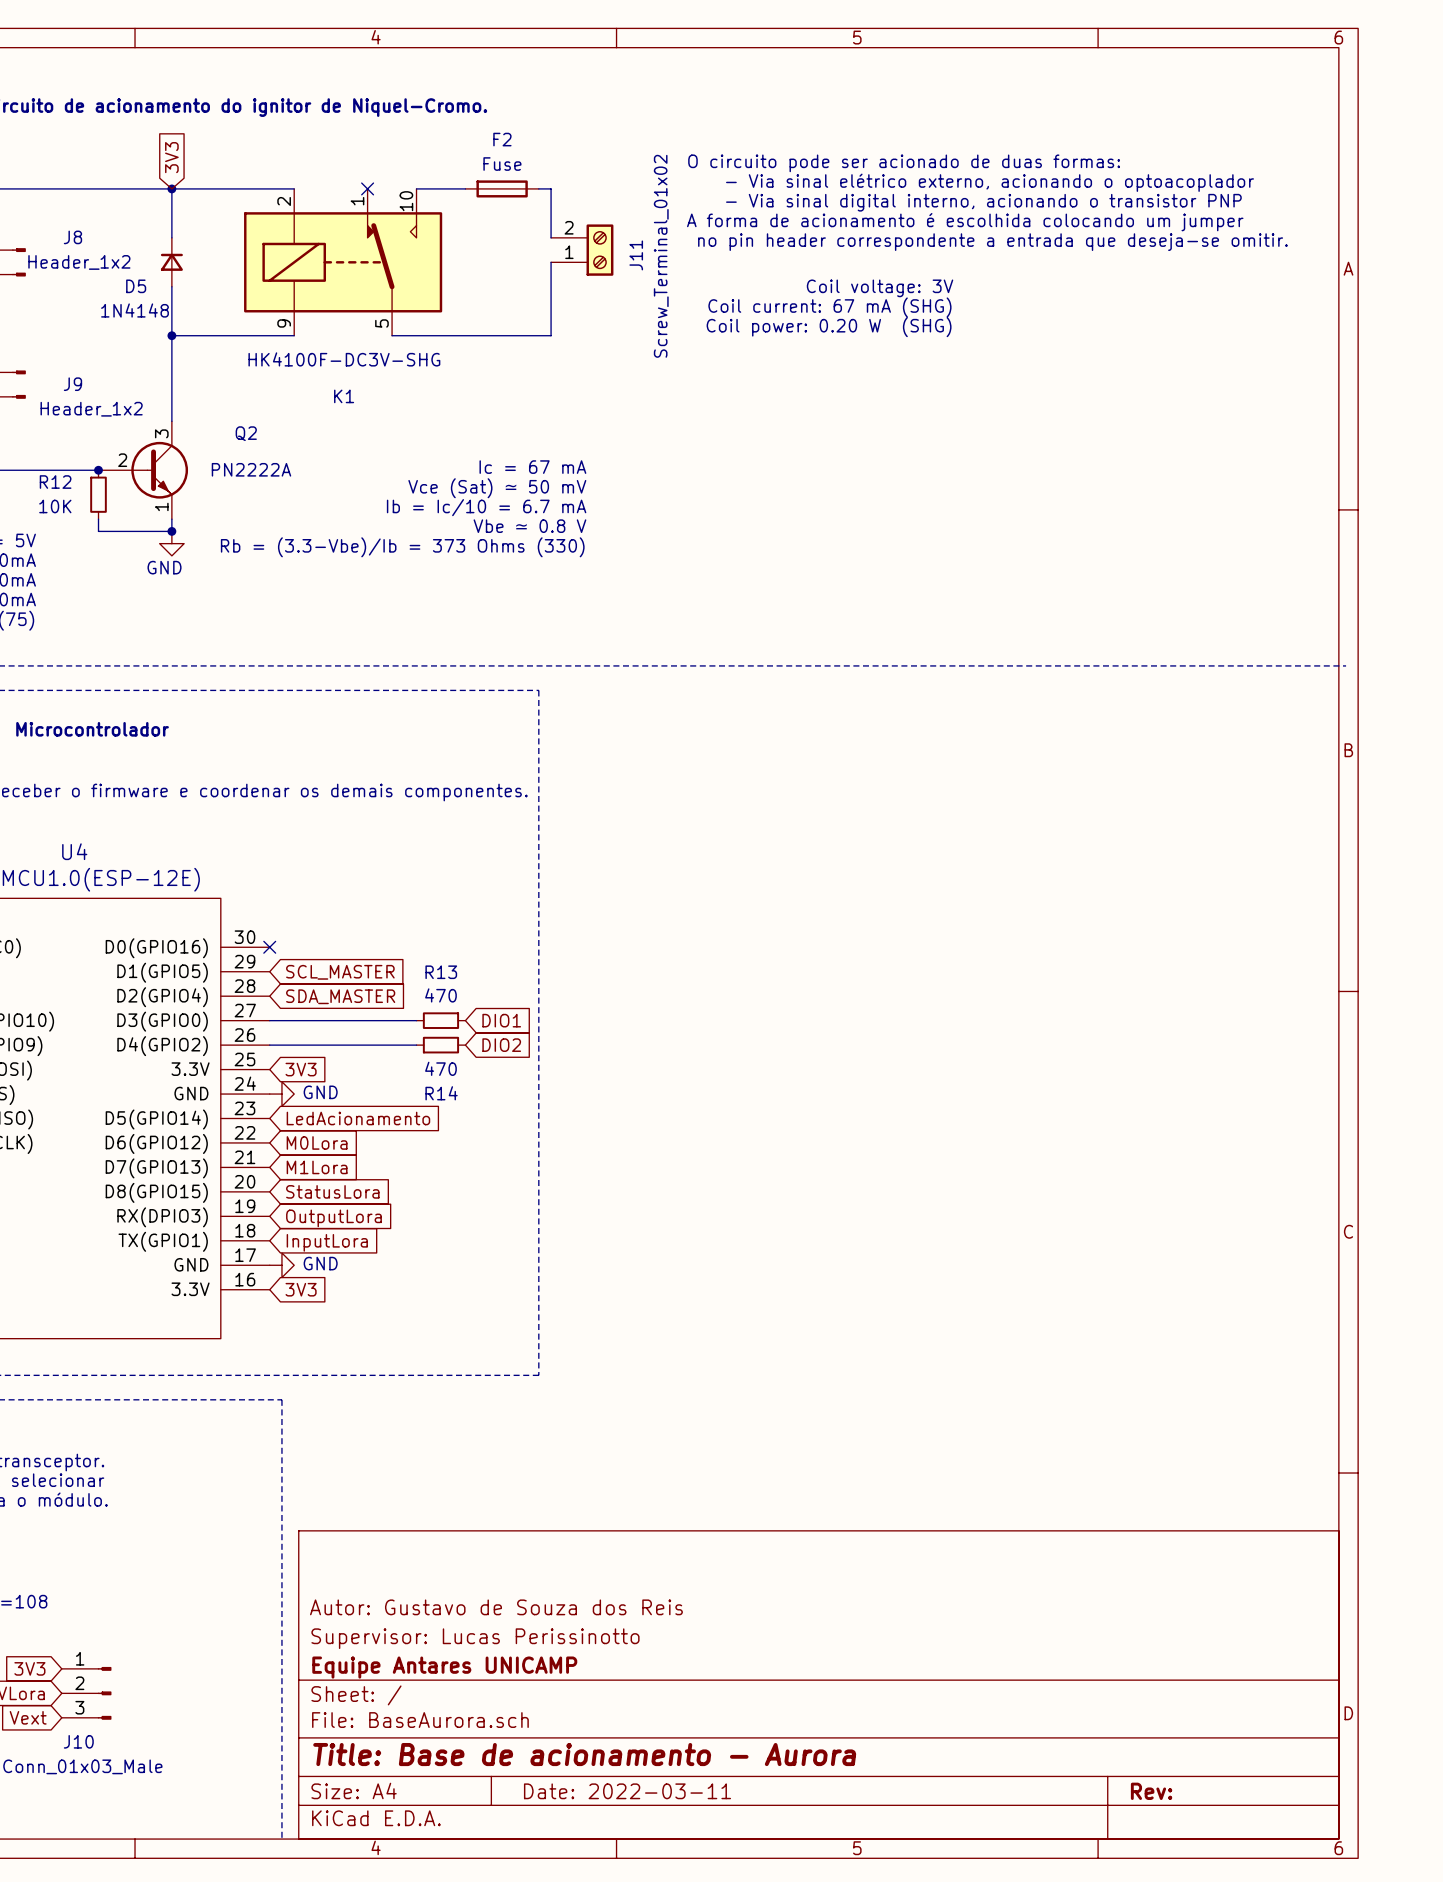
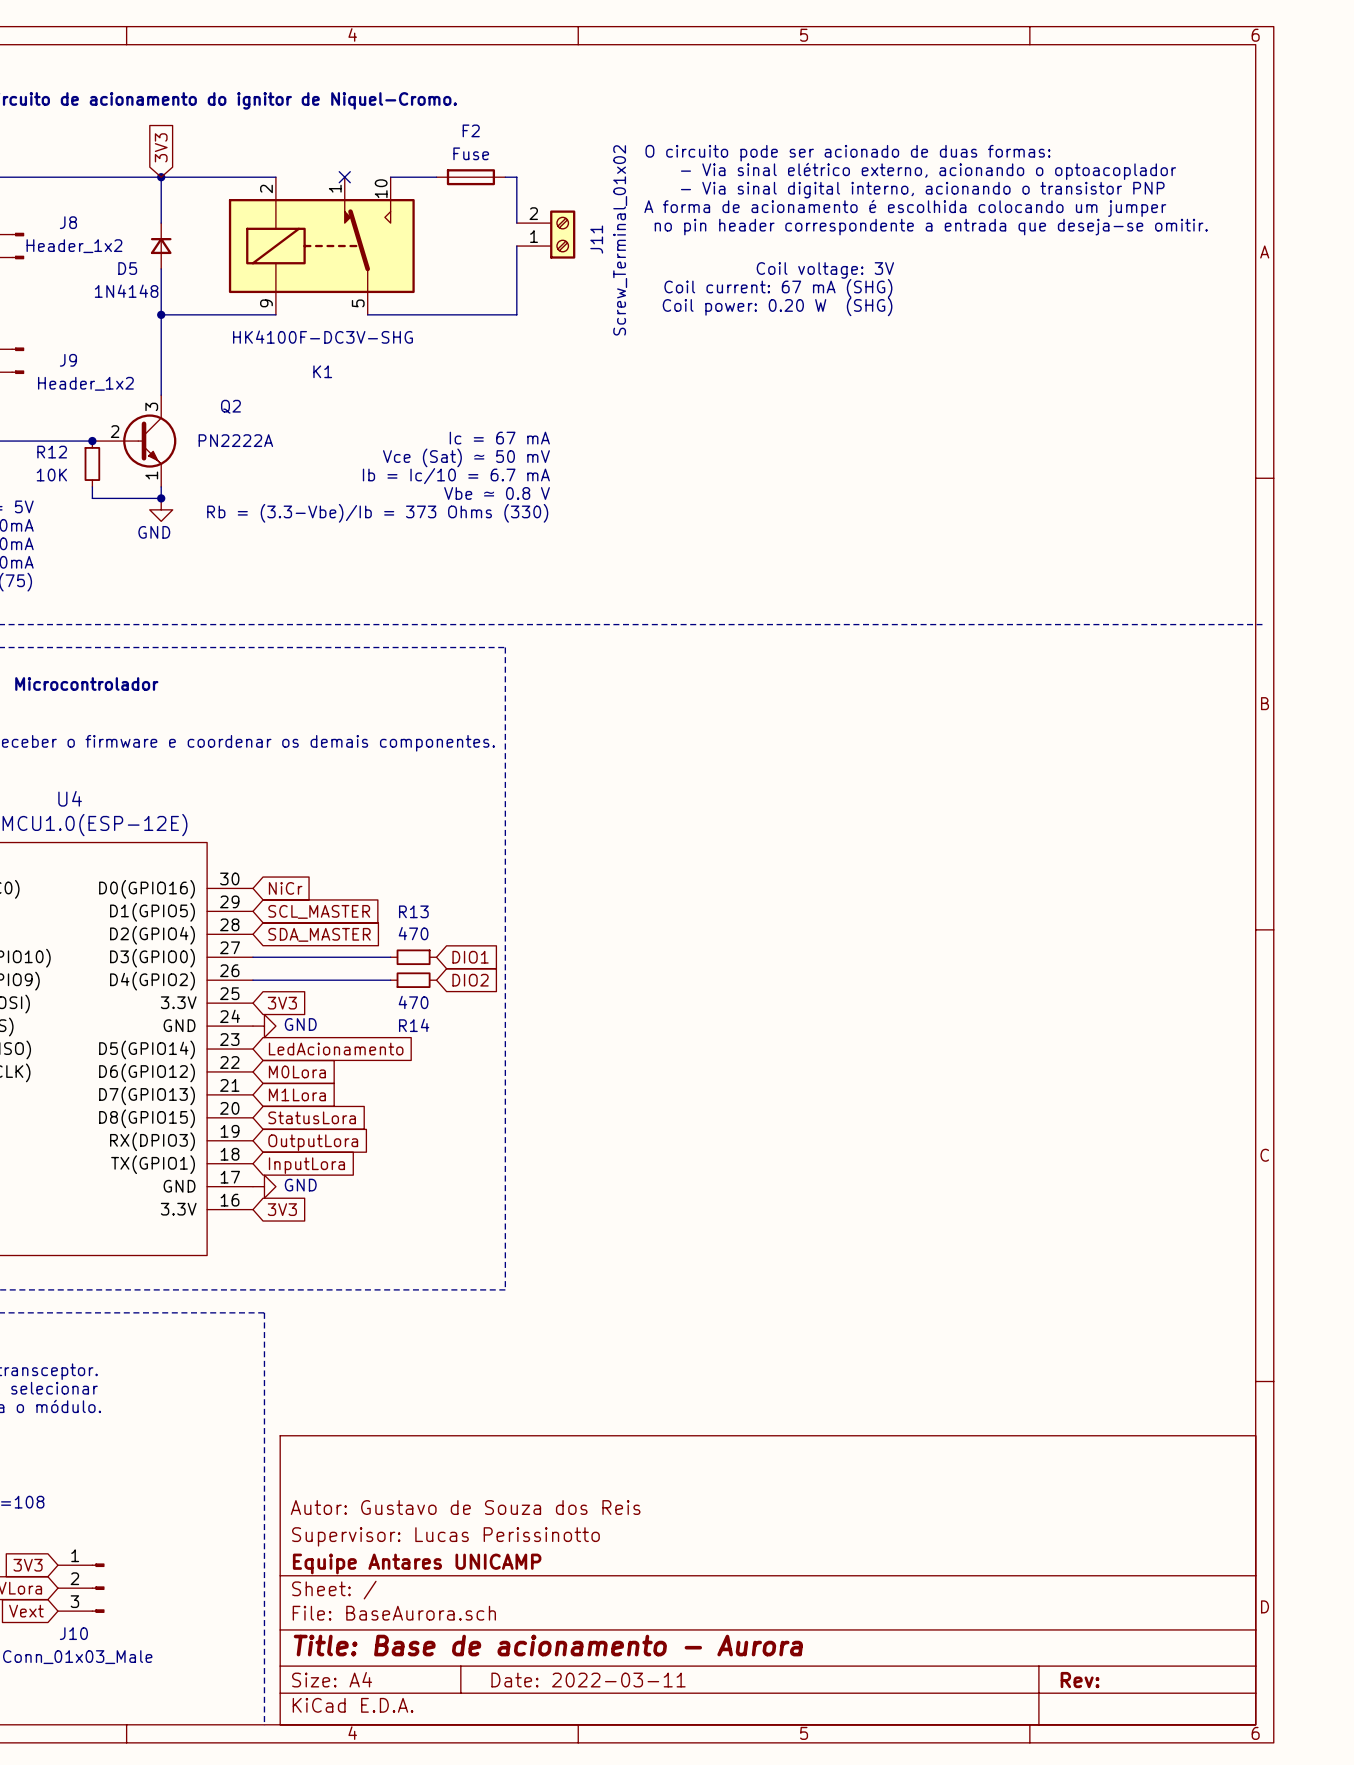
no-connect mark: (269, 947) -> none
global label: none -> NiCr (285, 888)

